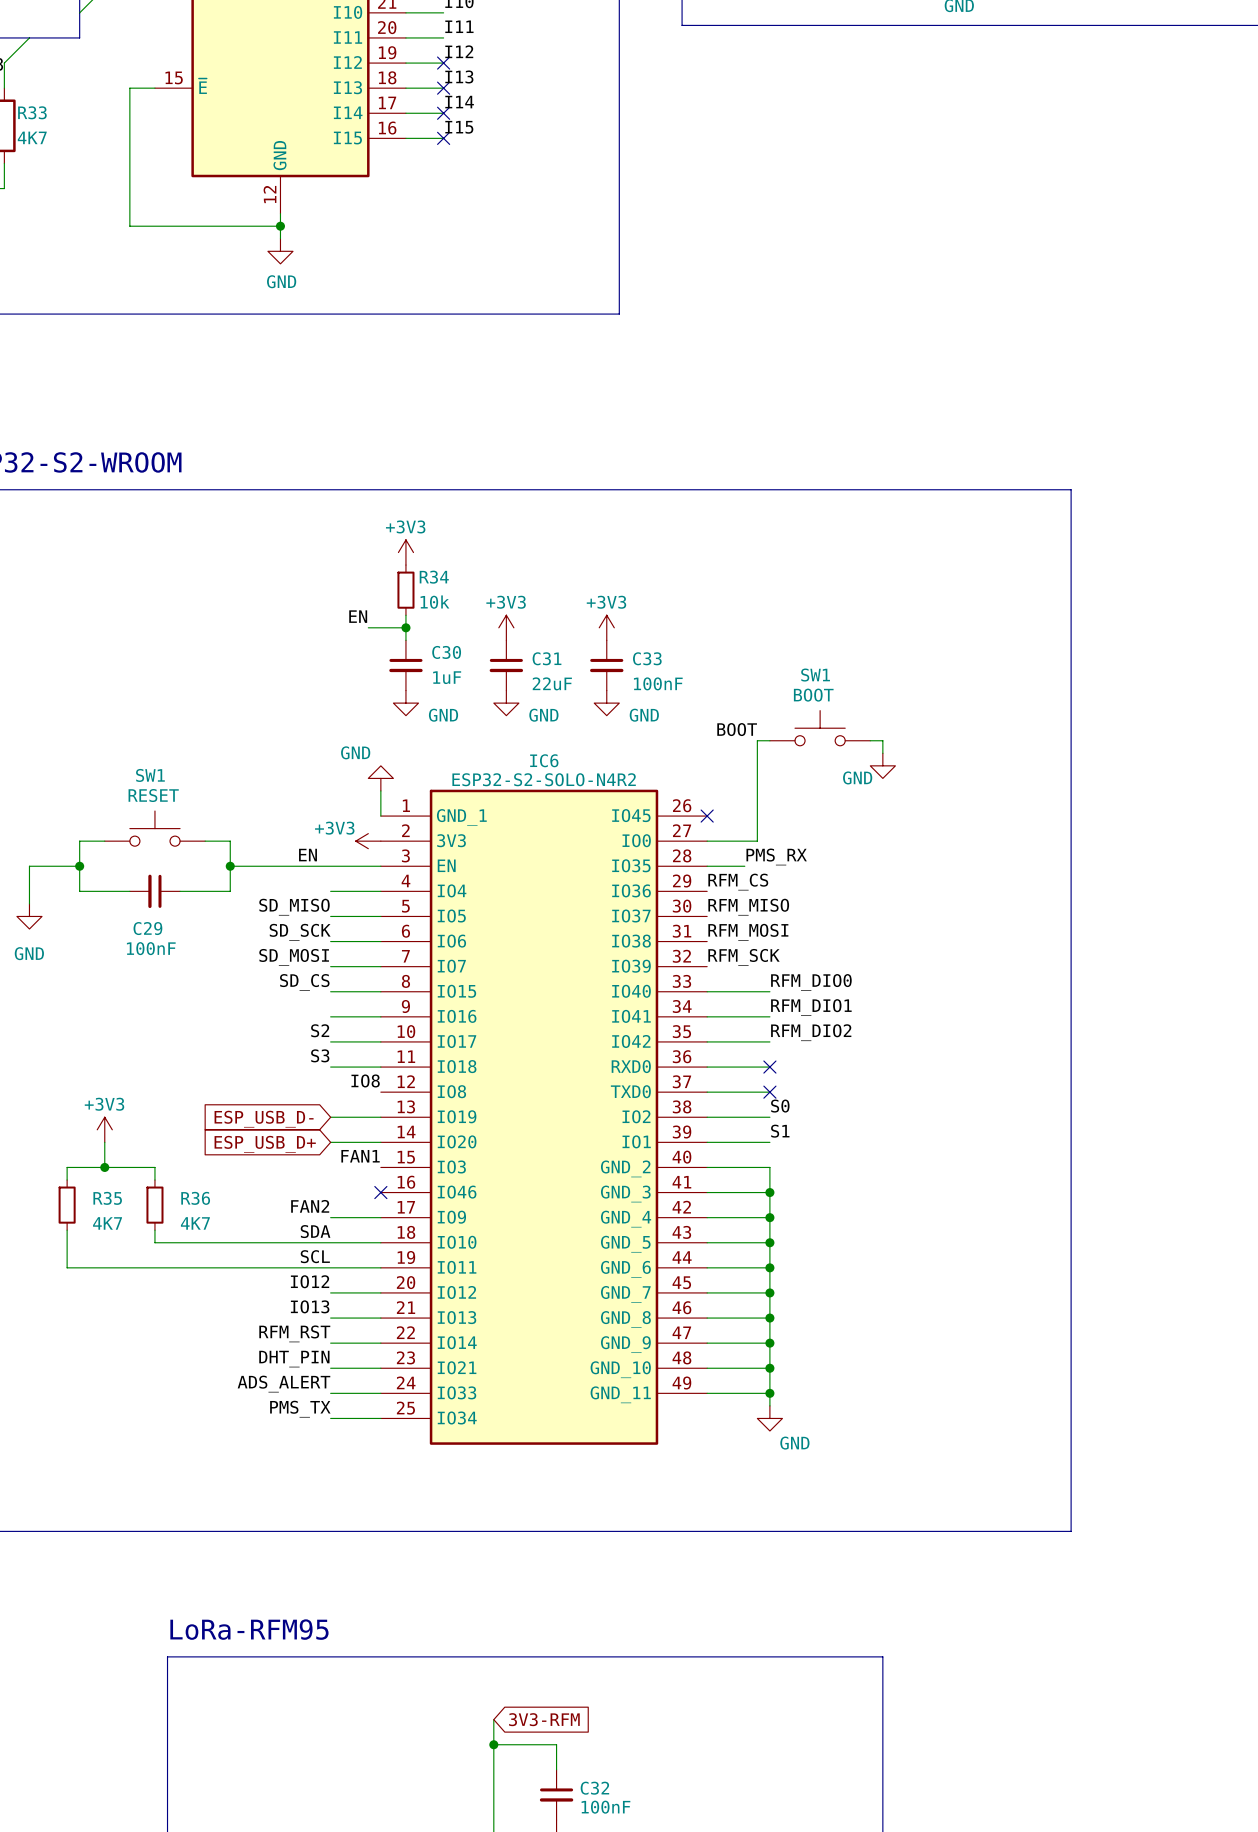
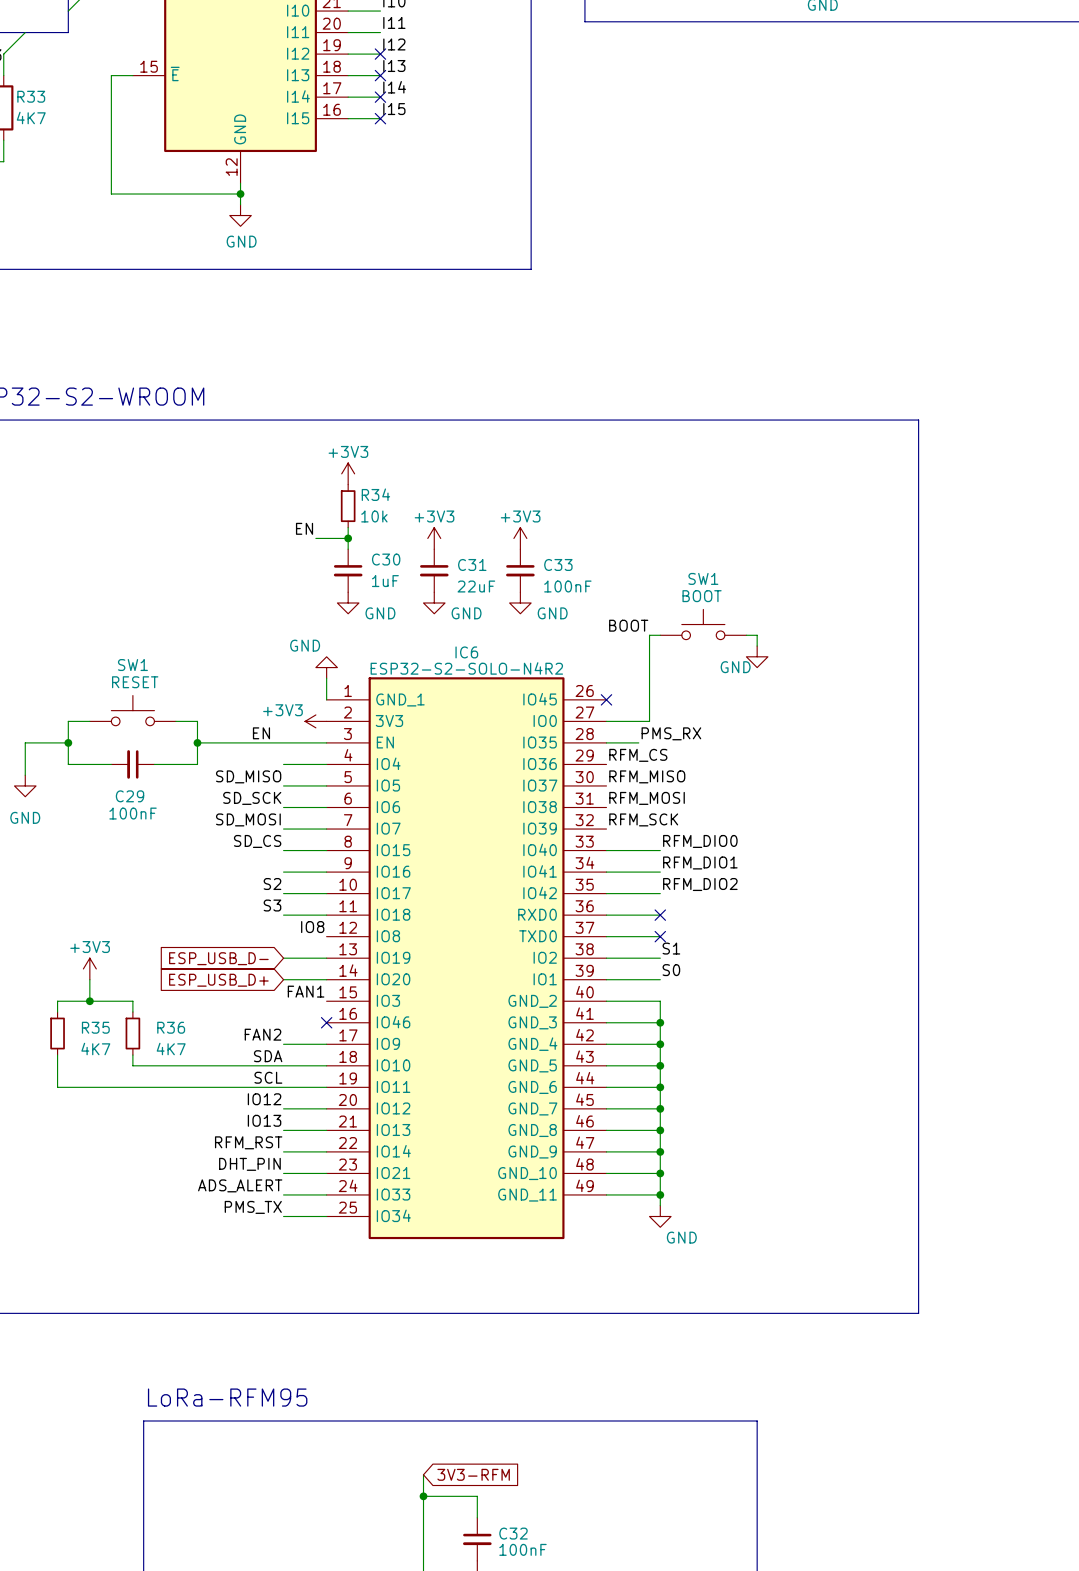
label: S0 (780, 1106) -> S1 (671, 948)
label: S1 (780, 1131) -> S0 (671, 970)

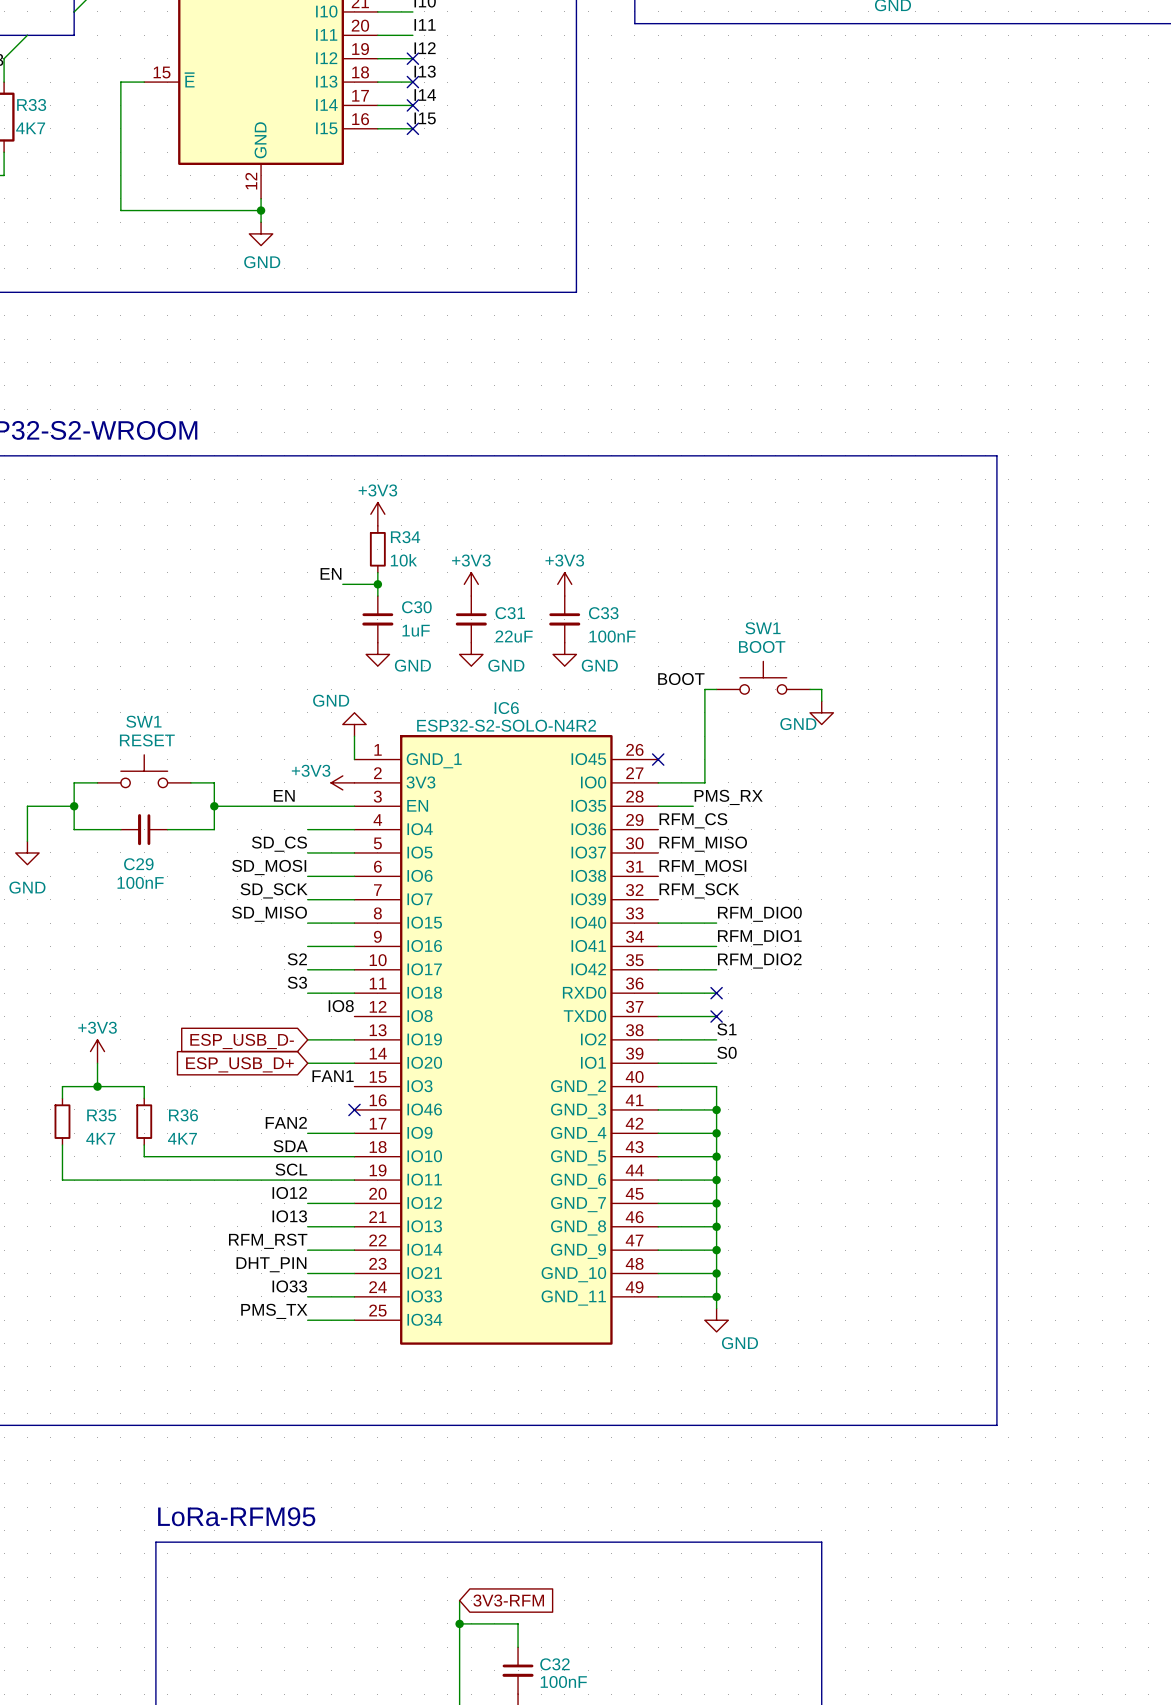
label: SD_MISO (248, 776) -> SD_CS (279, 844)
label: SD_SCK (252, 798) -> SD_MOSI (269, 867)
label: SD_MOSI (248, 819) -> SD_SCK (274, 890)
label: SD_CS (257, 841) -> SD_MISO (269, 914)
label: ADS_ALERT (240, 1185) -> IO33 (289, 1286)

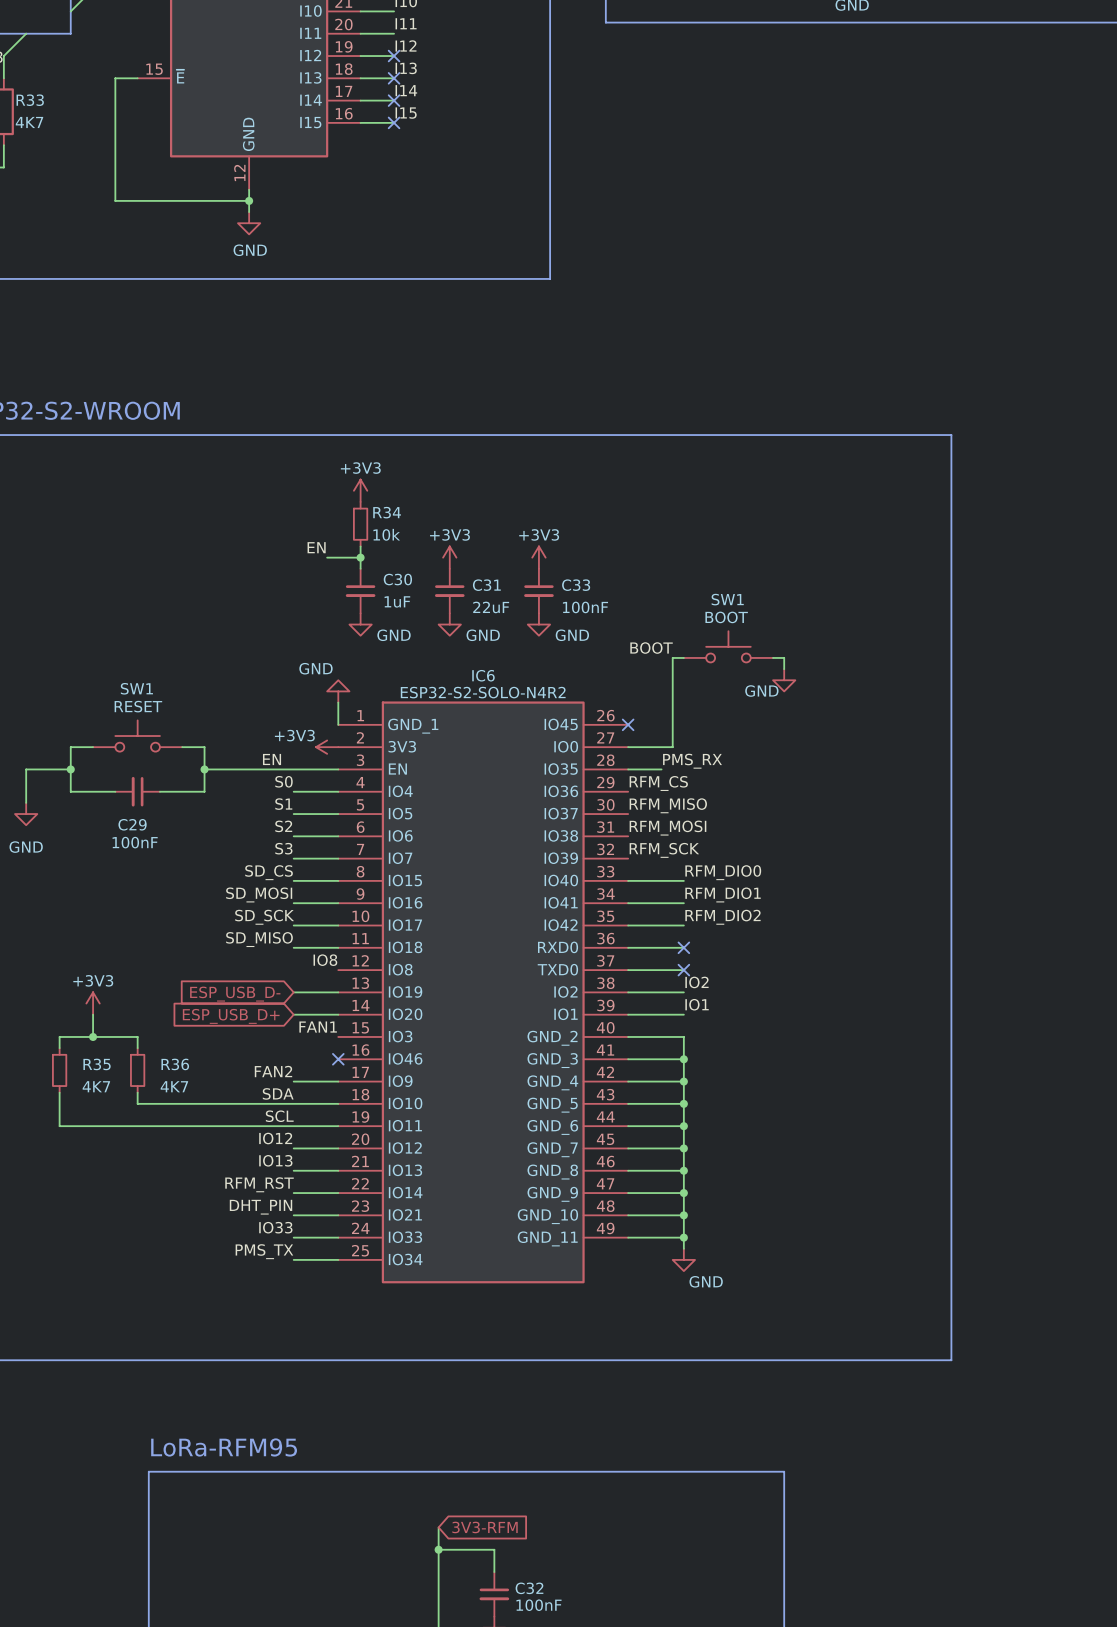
label: none -> S0 (283, 781)
label: SD_CS (279, 844) -> S1 (283, 804)
label: SD_MOSI (269, 867) -> S2 (283, 826)
label: SD_SCK (274, 890) -> S3 (283, 848)
label: SD_MISO (269, 914) -> SD_CS (269, 872)
label: none -> SD_MOSI (259, 894)
label: S2 (297, 959) -> SD_SCK (264, 917)
label: S3 (297, 982) -> SD_MISO (259, 939)
label: S1 (726, 1029) -> IO2 (696, 982)
label: S0 (727, 1052) -> IO1 (697, 1004)

